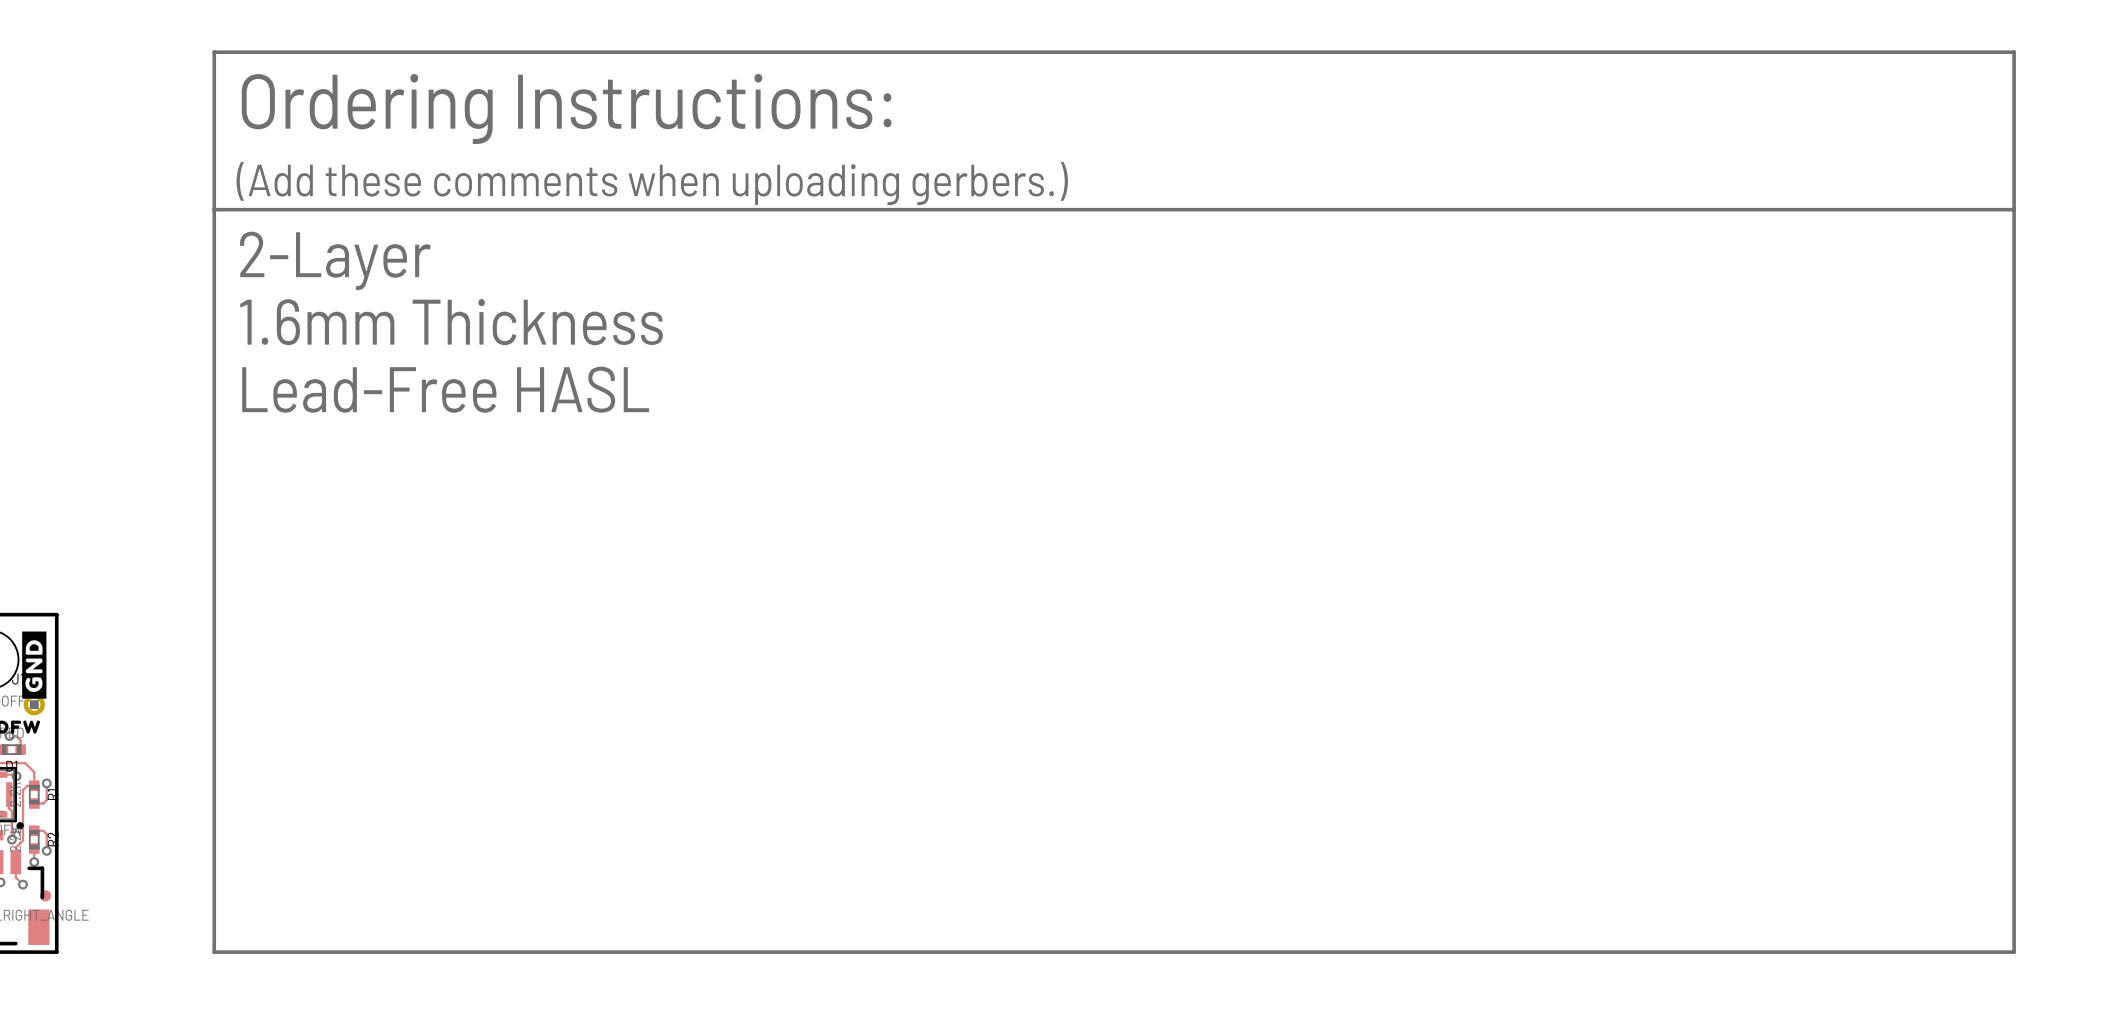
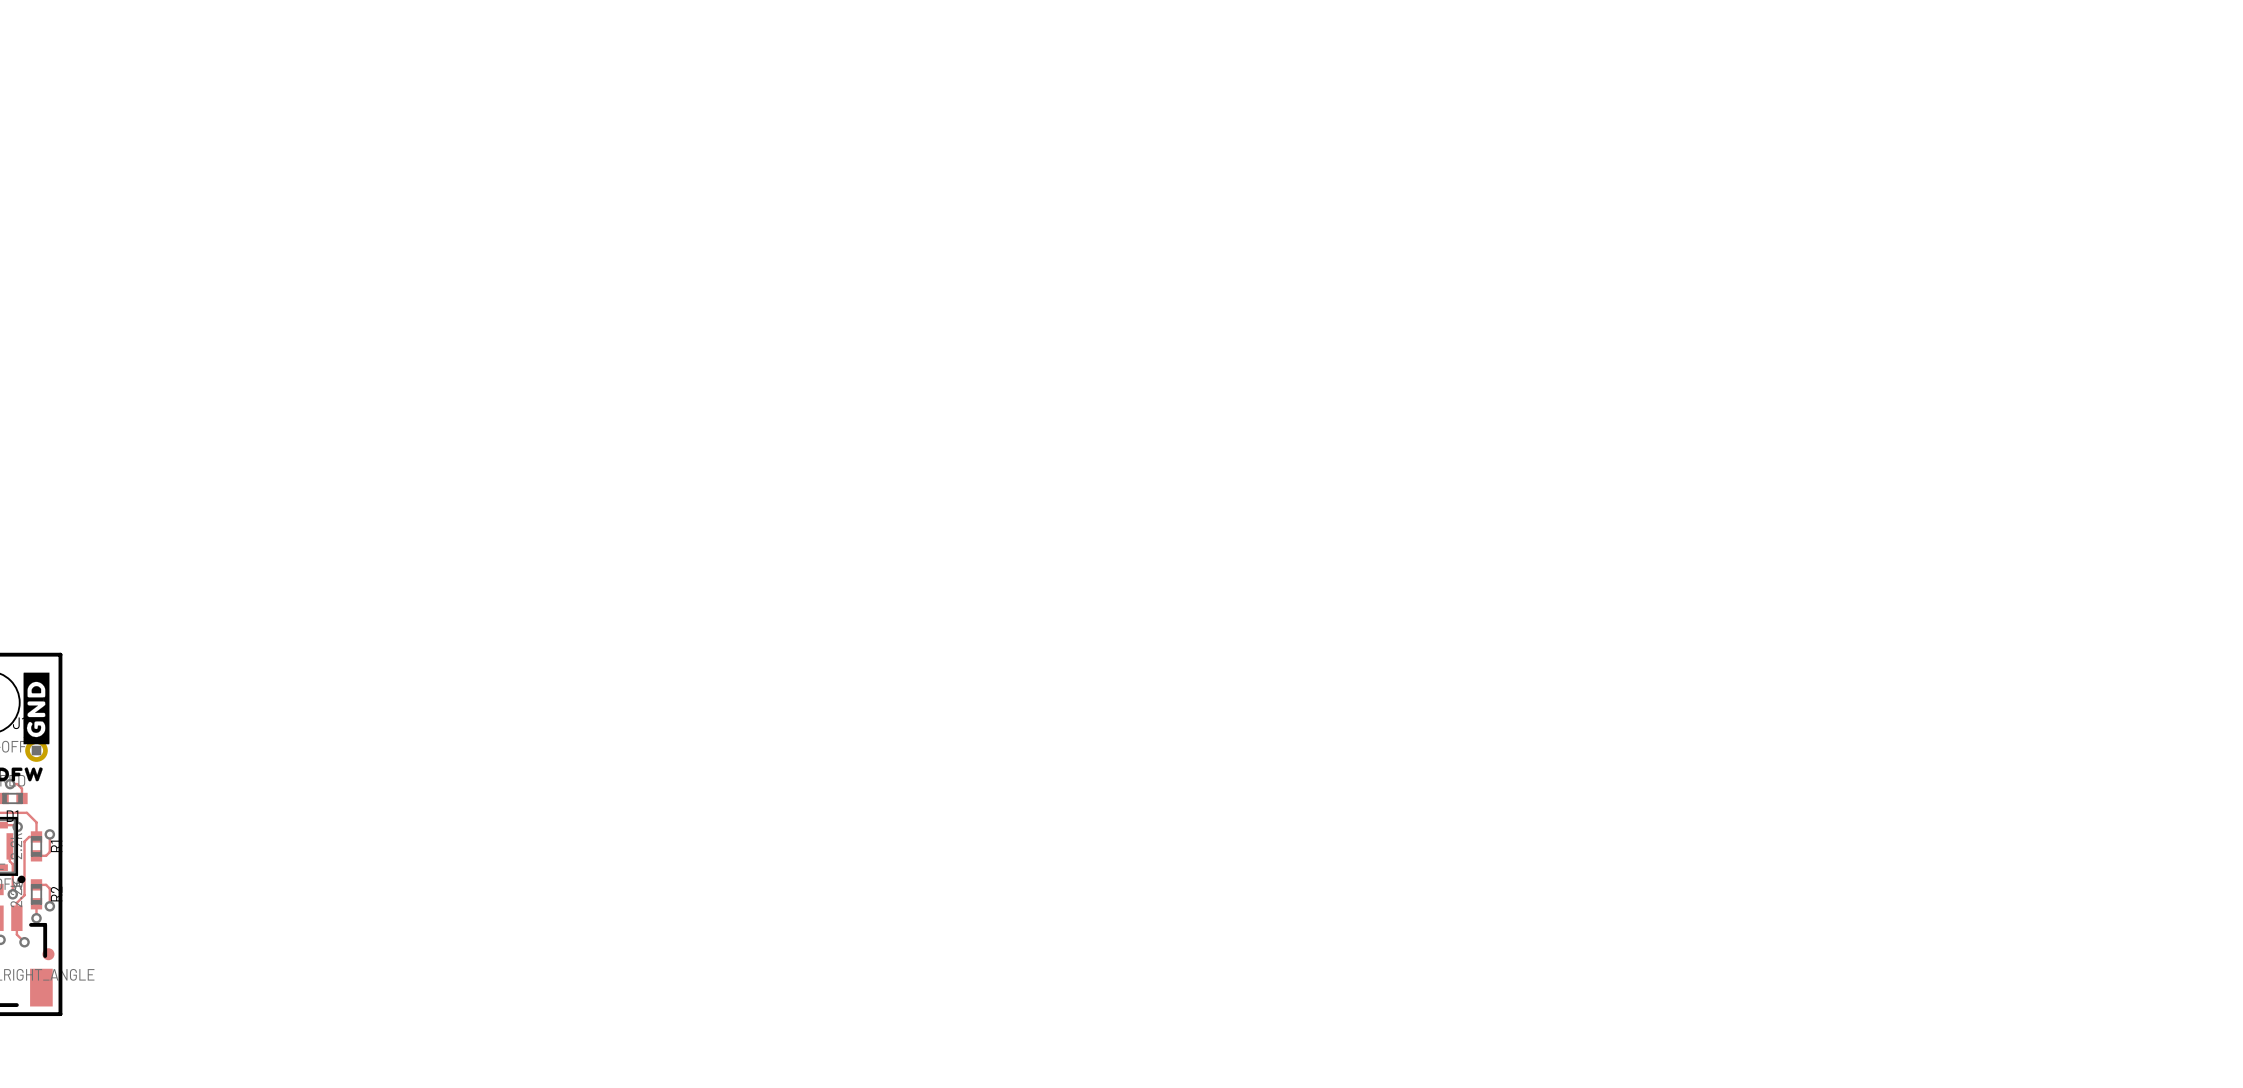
drawing: [212, 50, 2016, 954] -> none
text: 2-Layer (335, 260) -> none
text: 1.6mm Thickness (451, 322) -> none
text: Lead-Free HASL (445, 389) -> none

